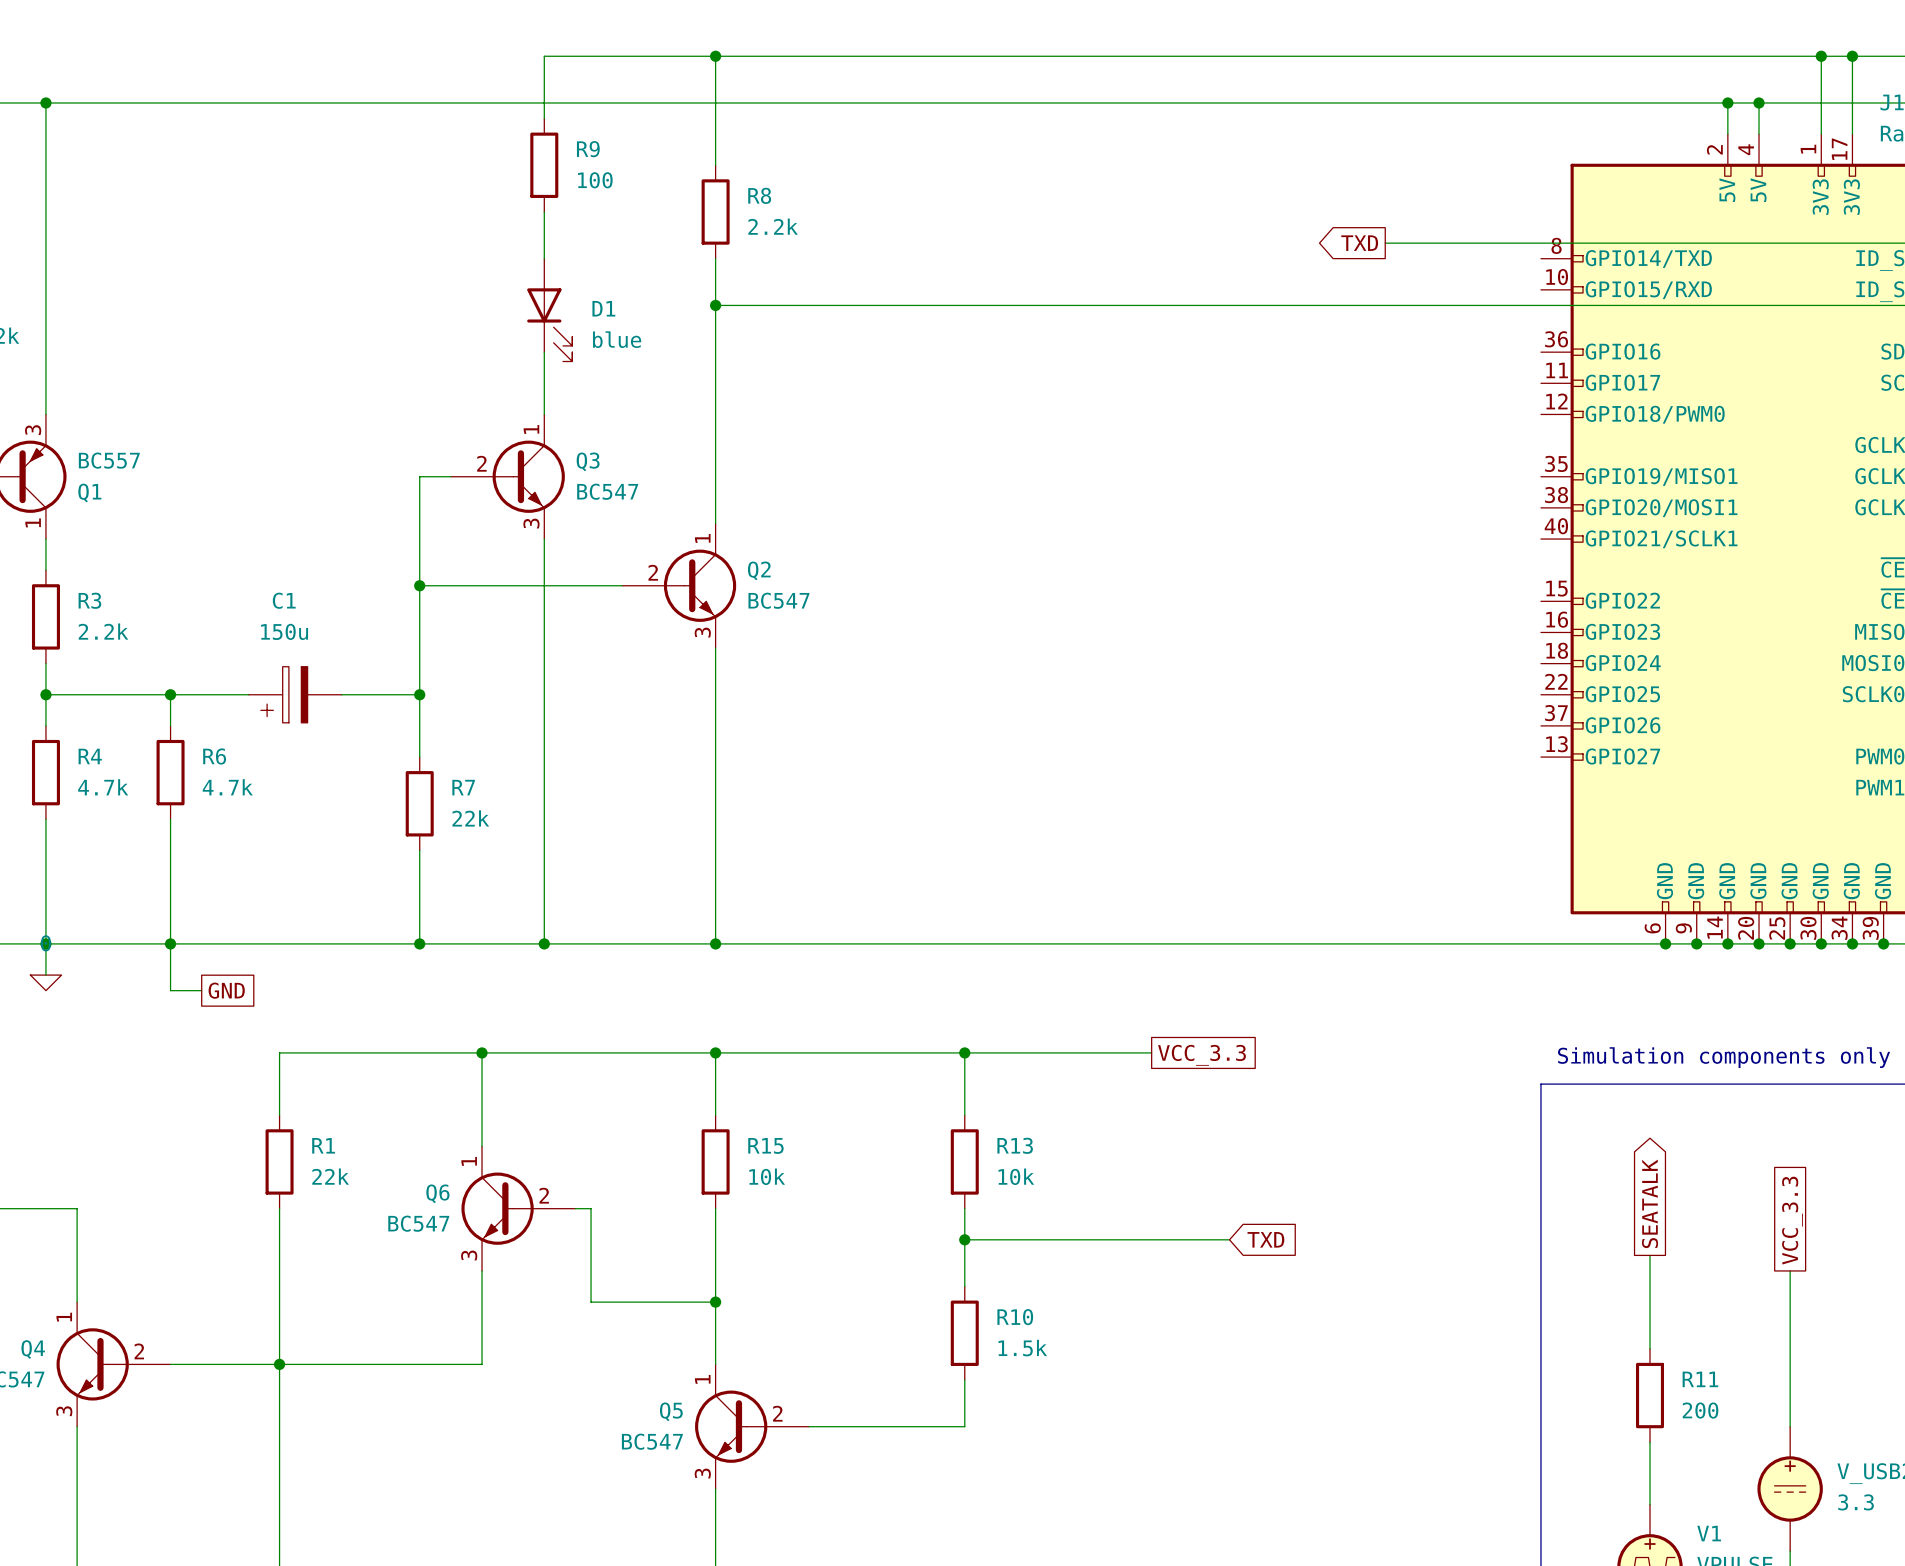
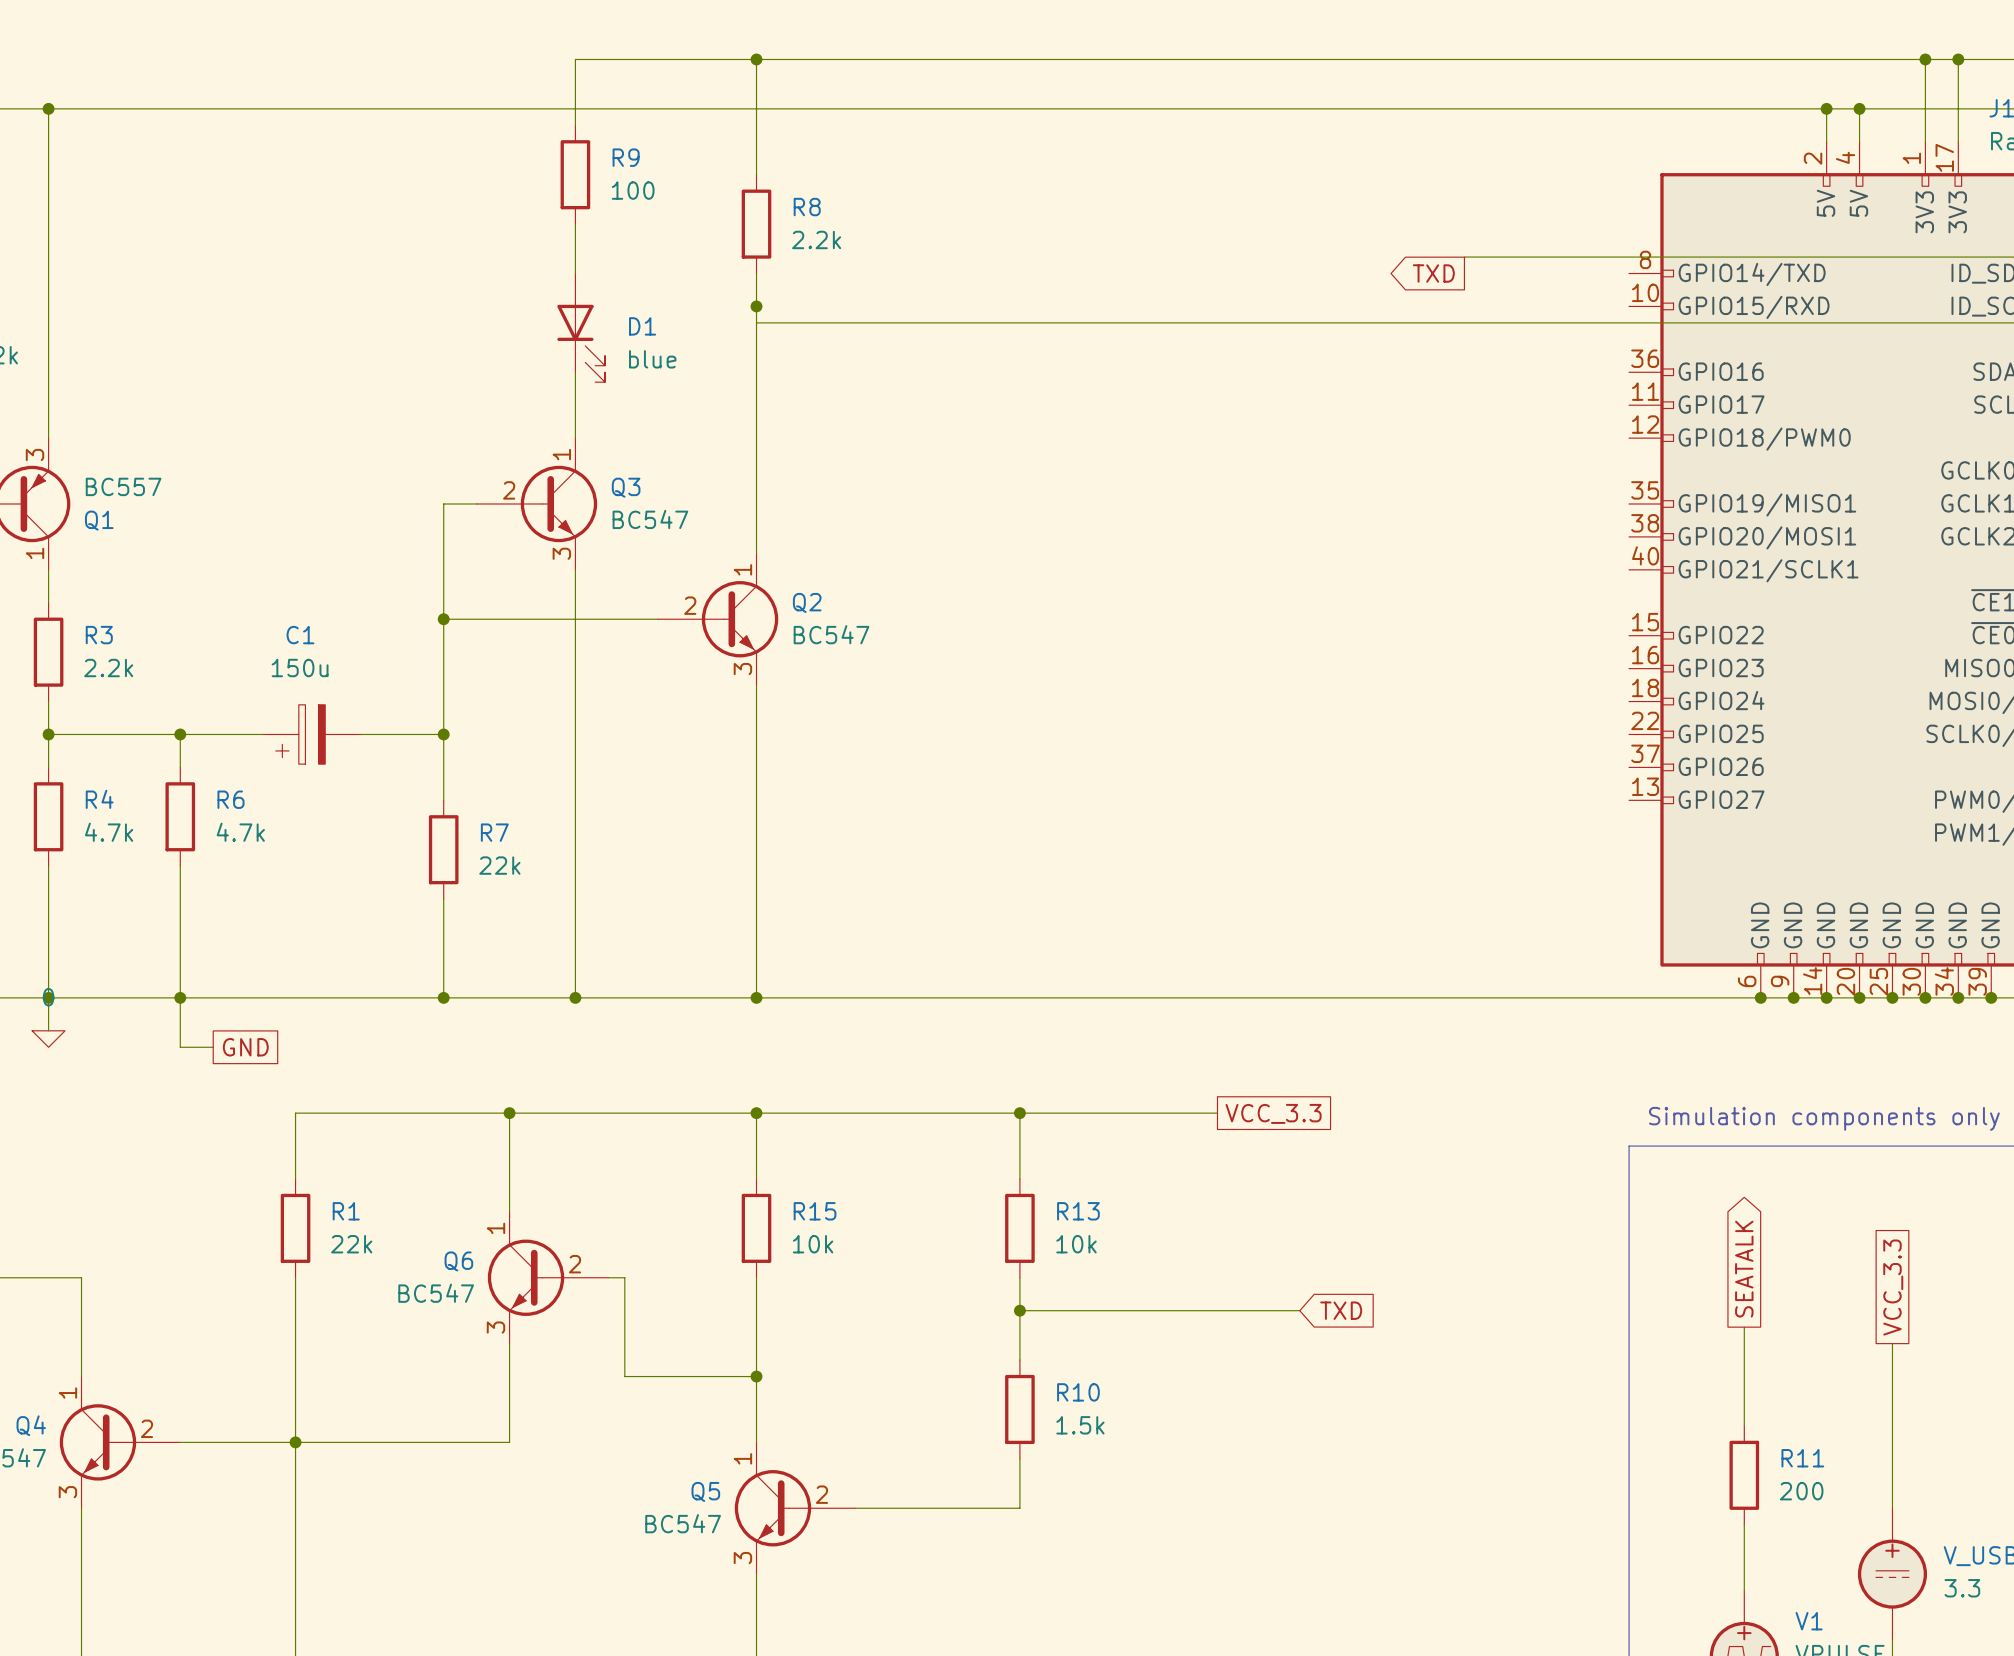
global label position: TXD (1359, 243) -> TXD (1433, 273)
junction position: (715, 305) -> (756, 306)

